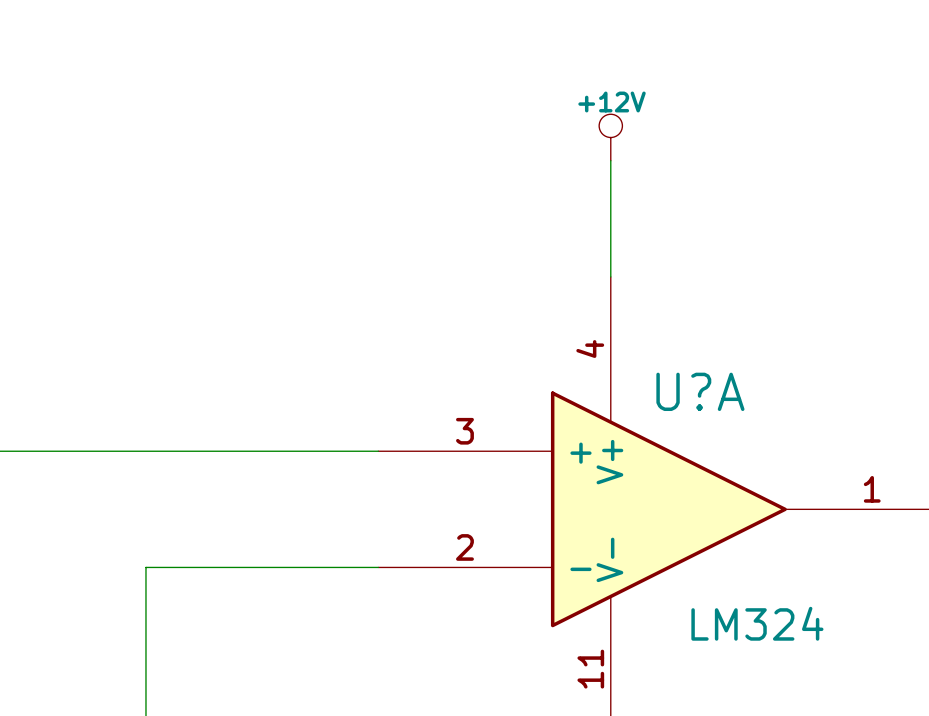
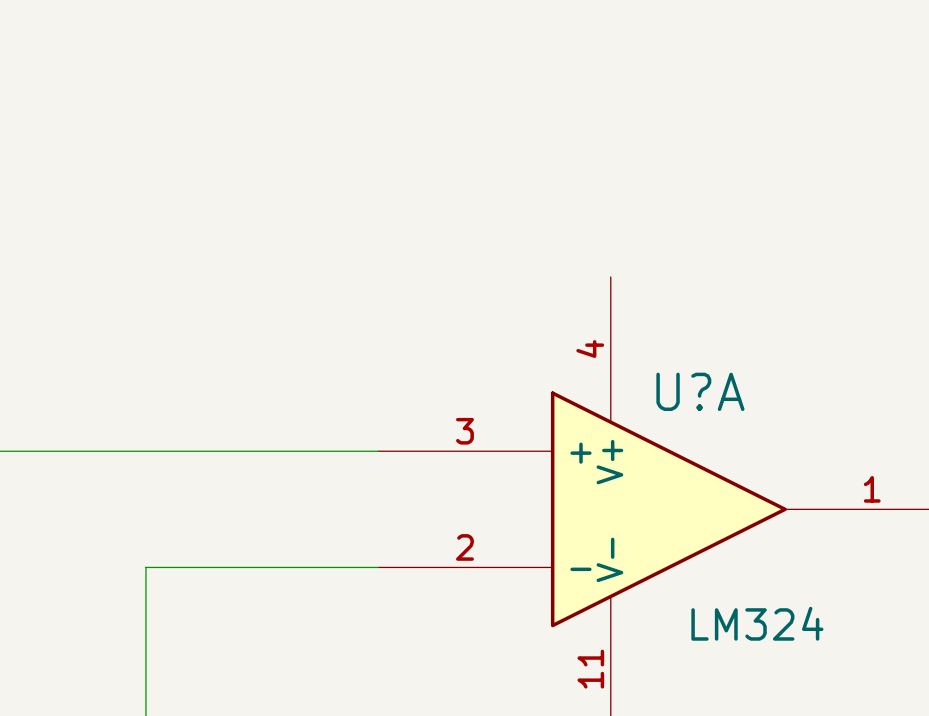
power symbol: +12V (610, 137) -> none
wire: (610, 160) (610, 276) -> none

